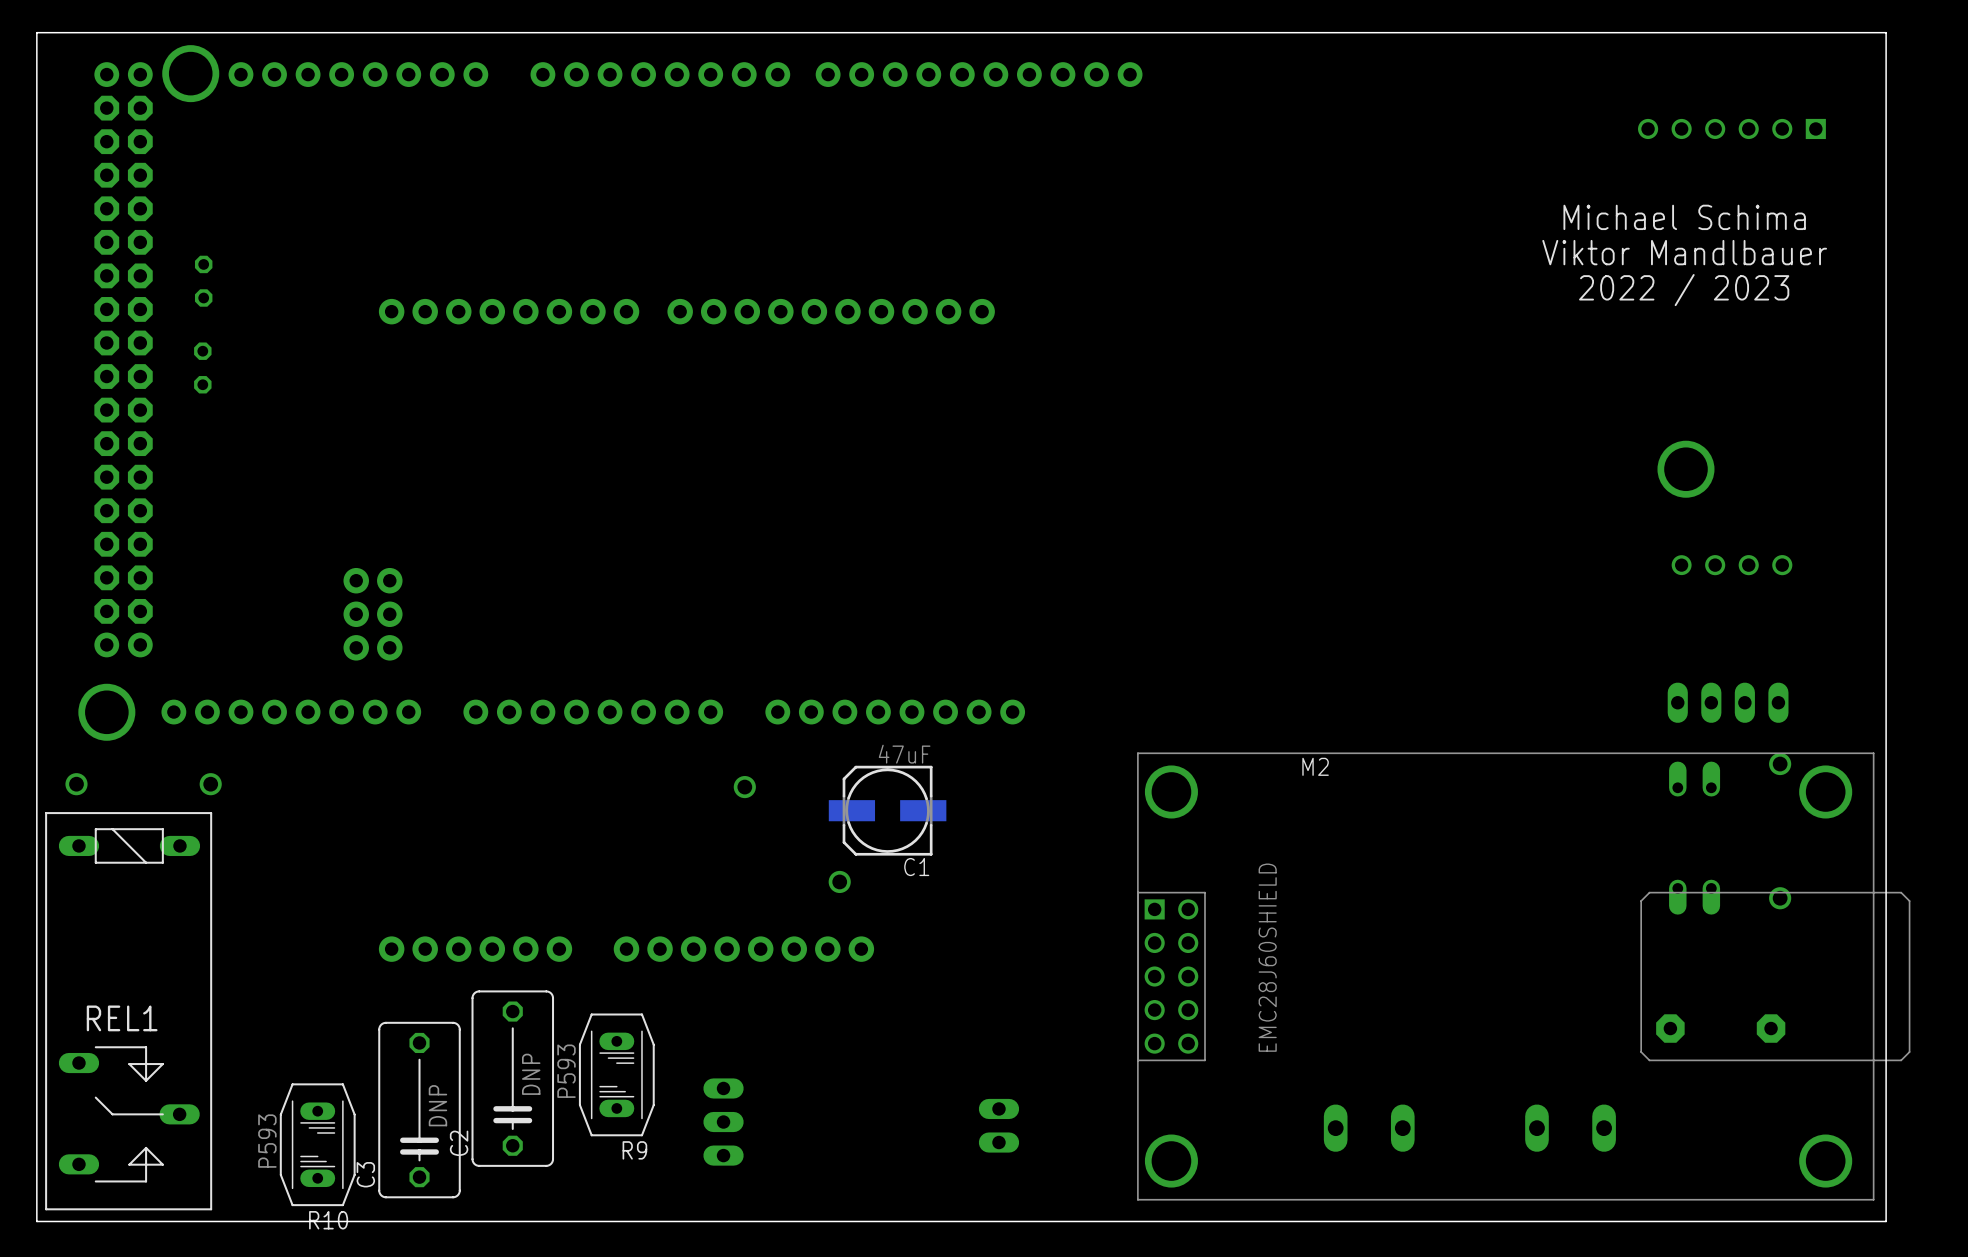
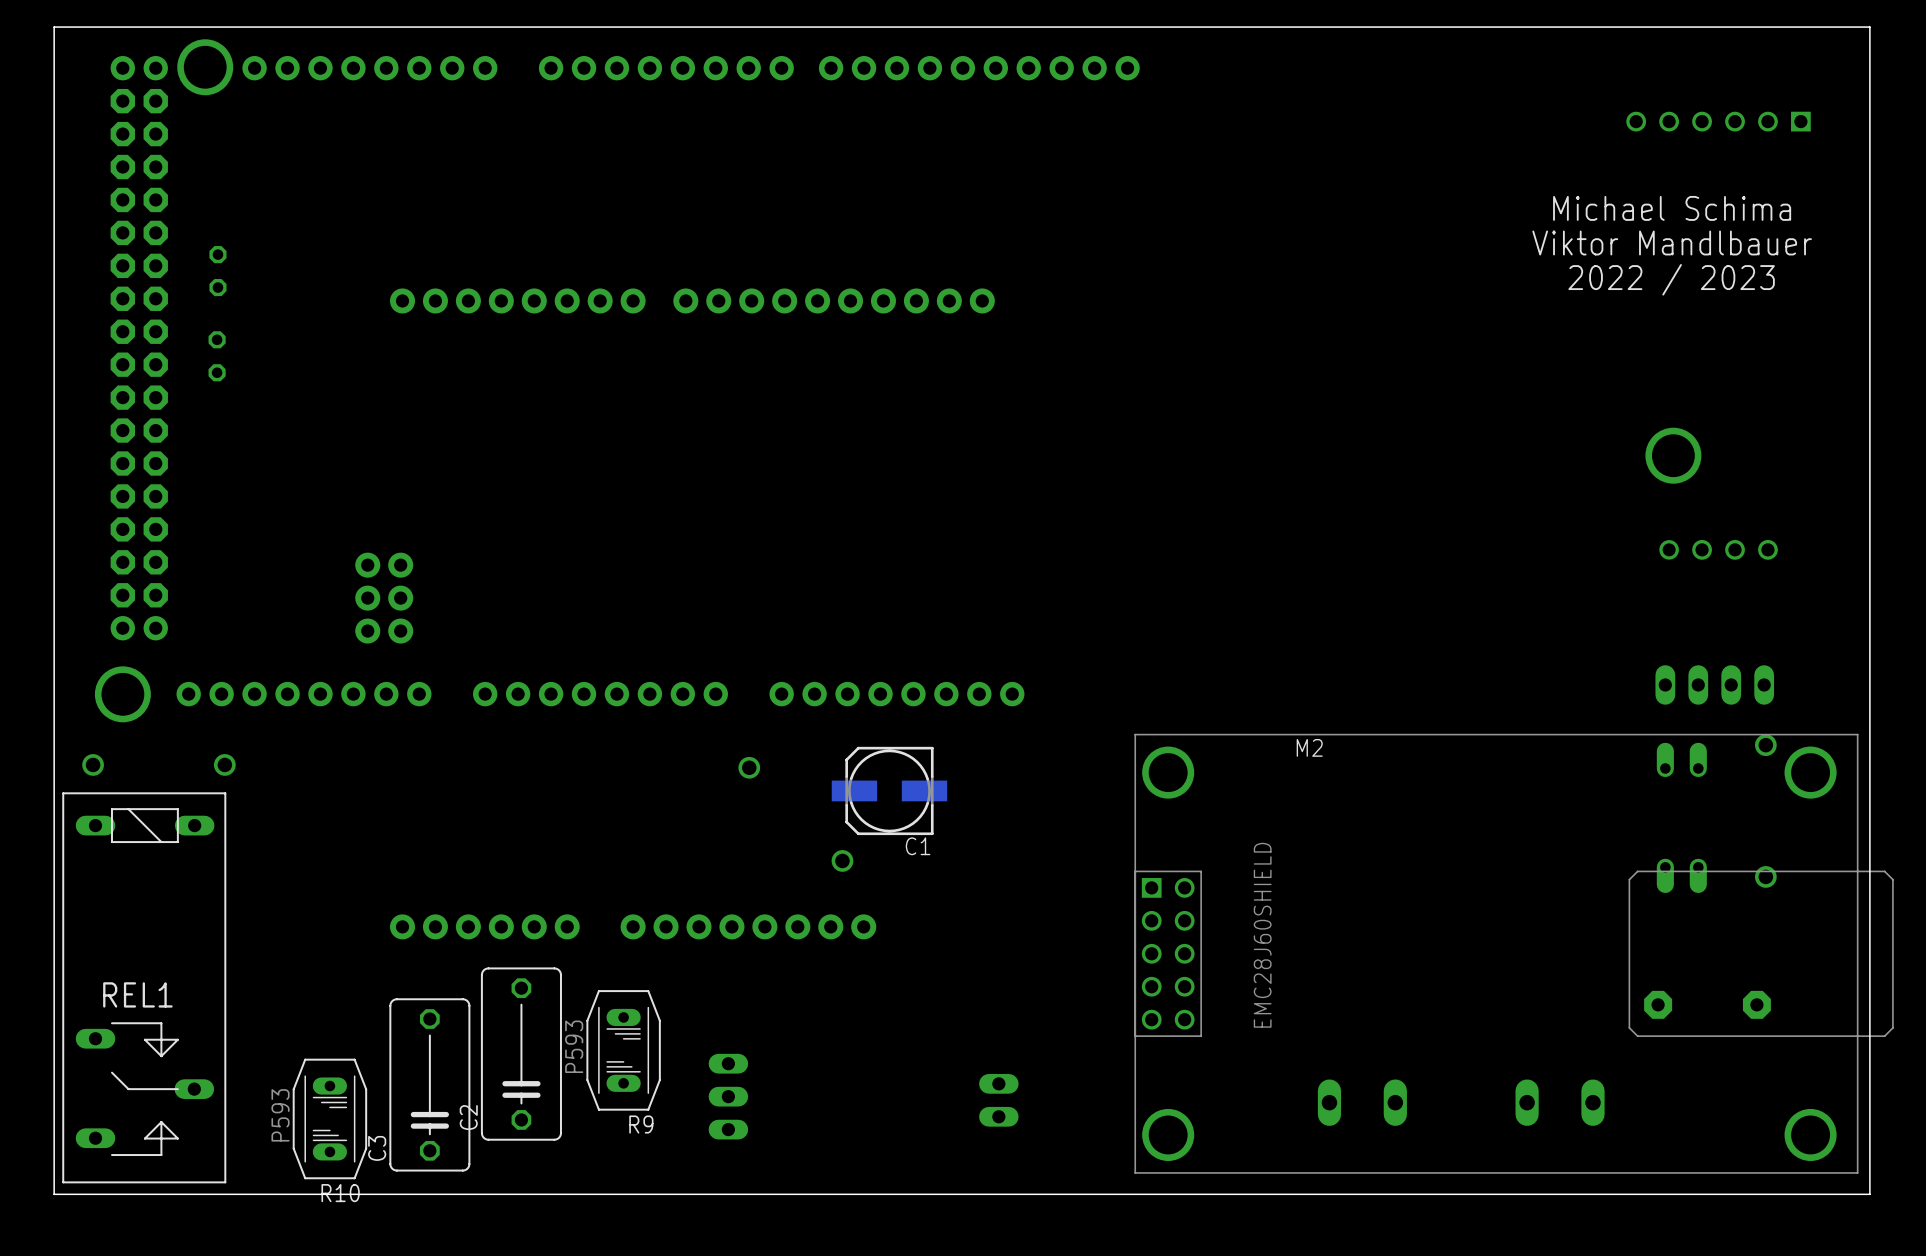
C1 value: 47uF (904, 754) -> none
C2 value: DNP (531, 1074) -> none
C3 value: DNP (437, 1105) -> none

